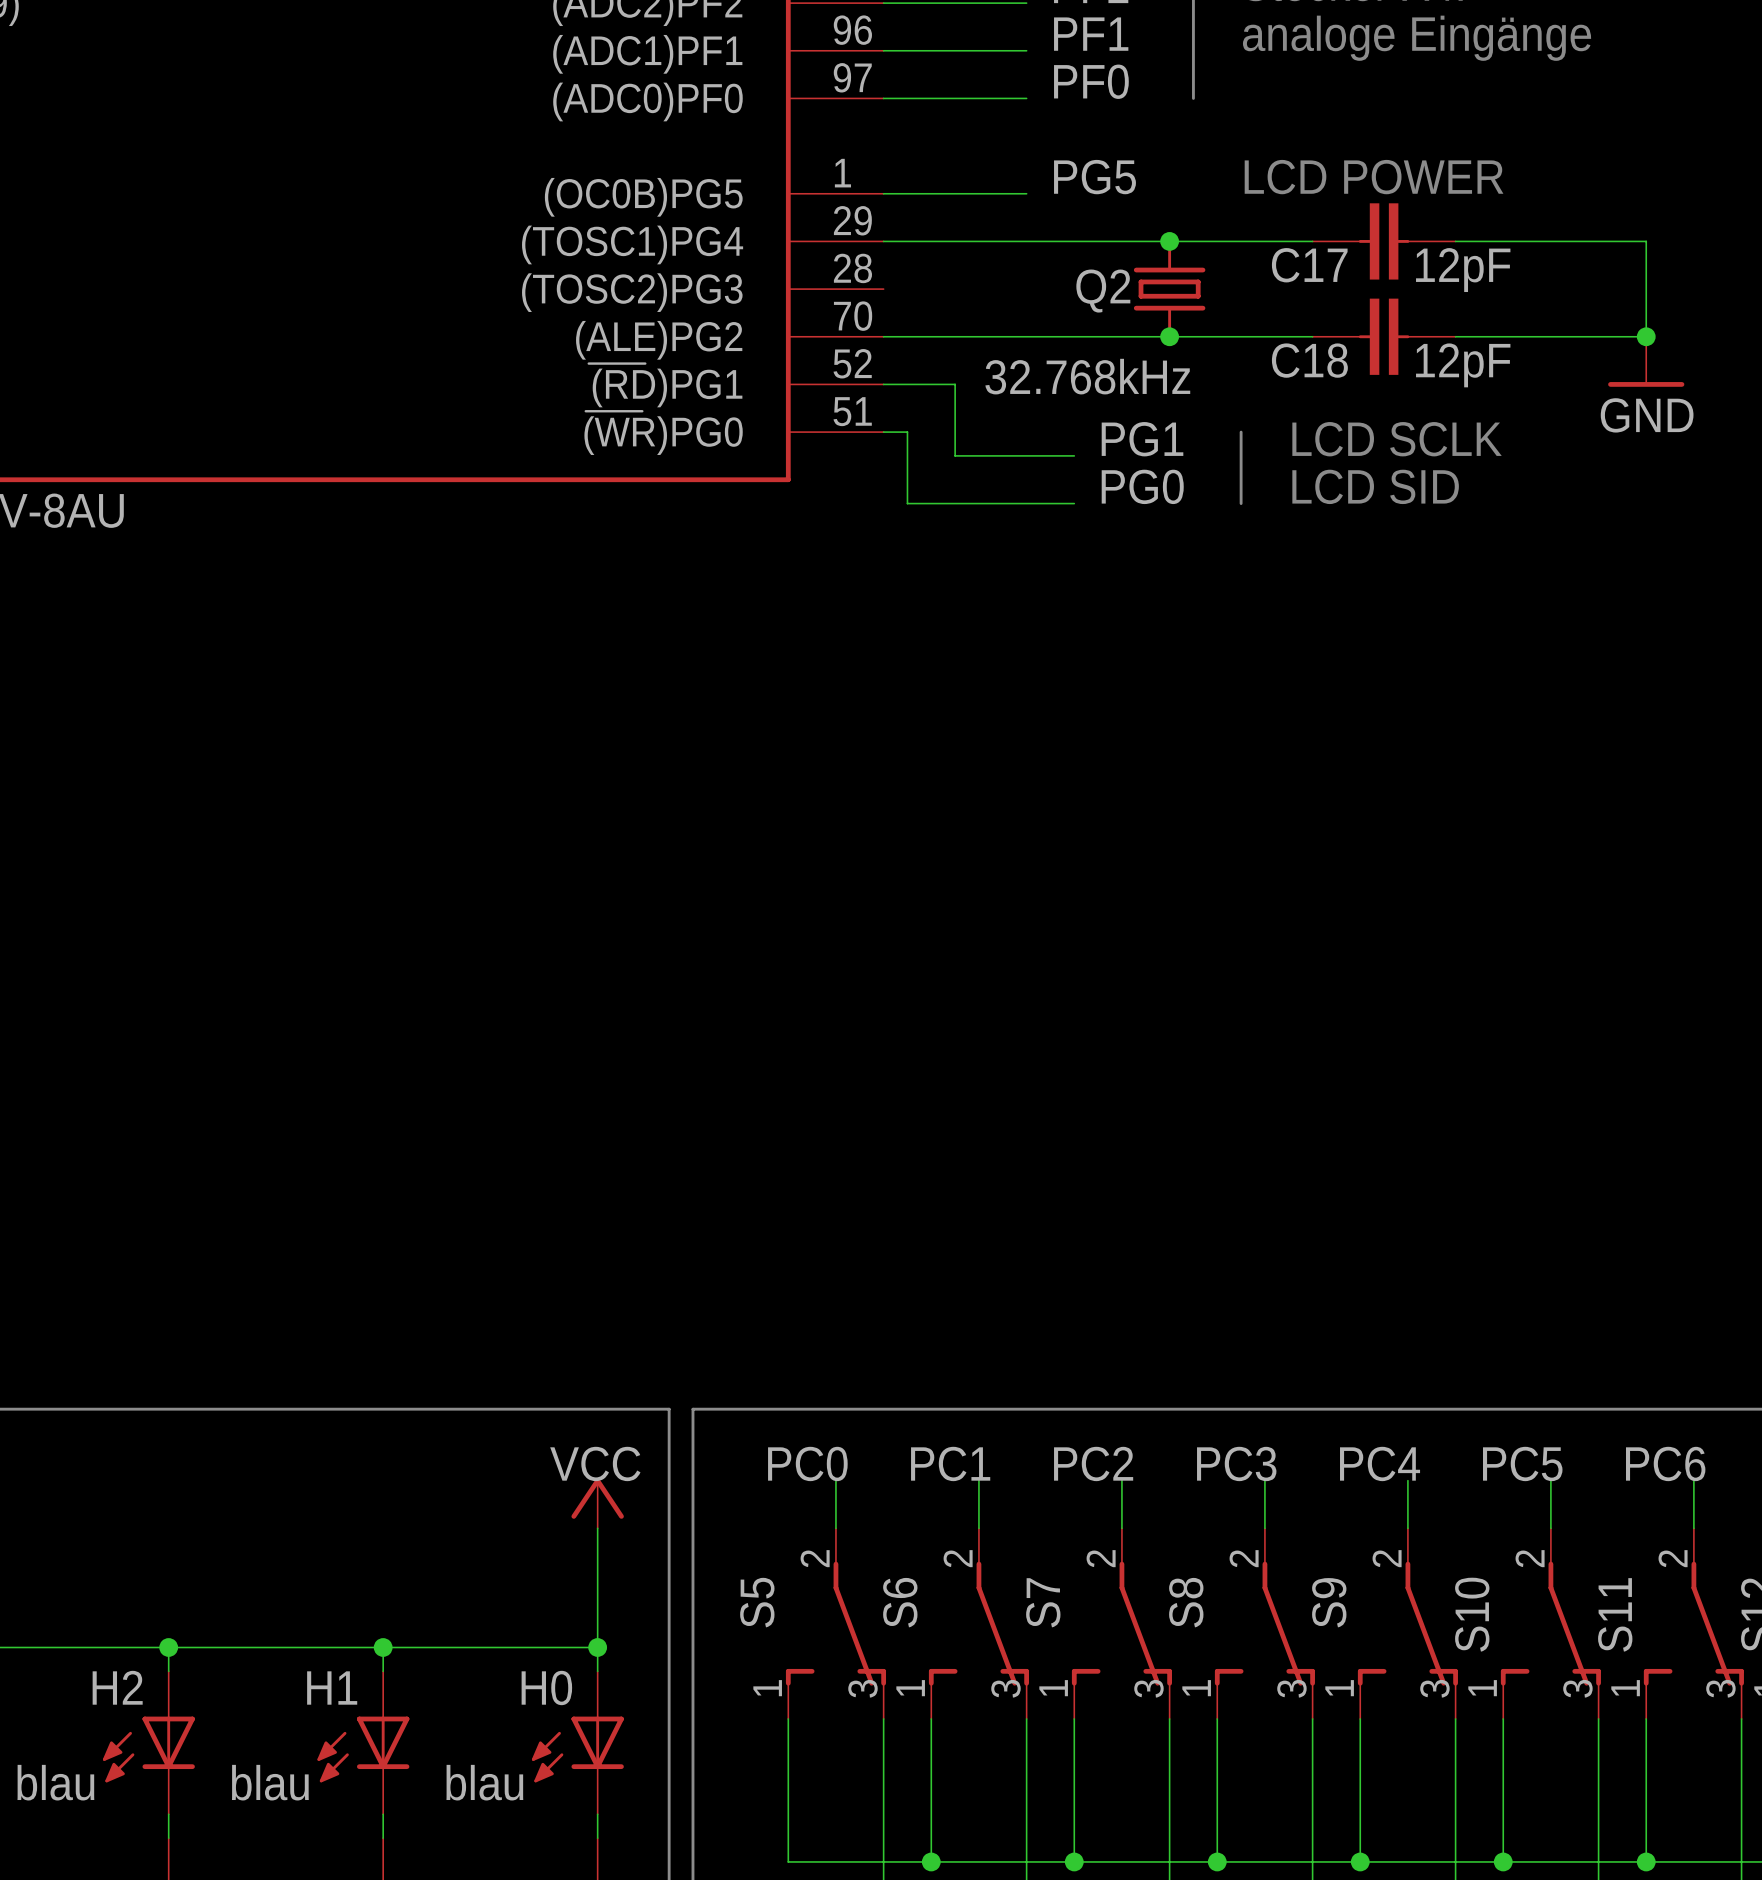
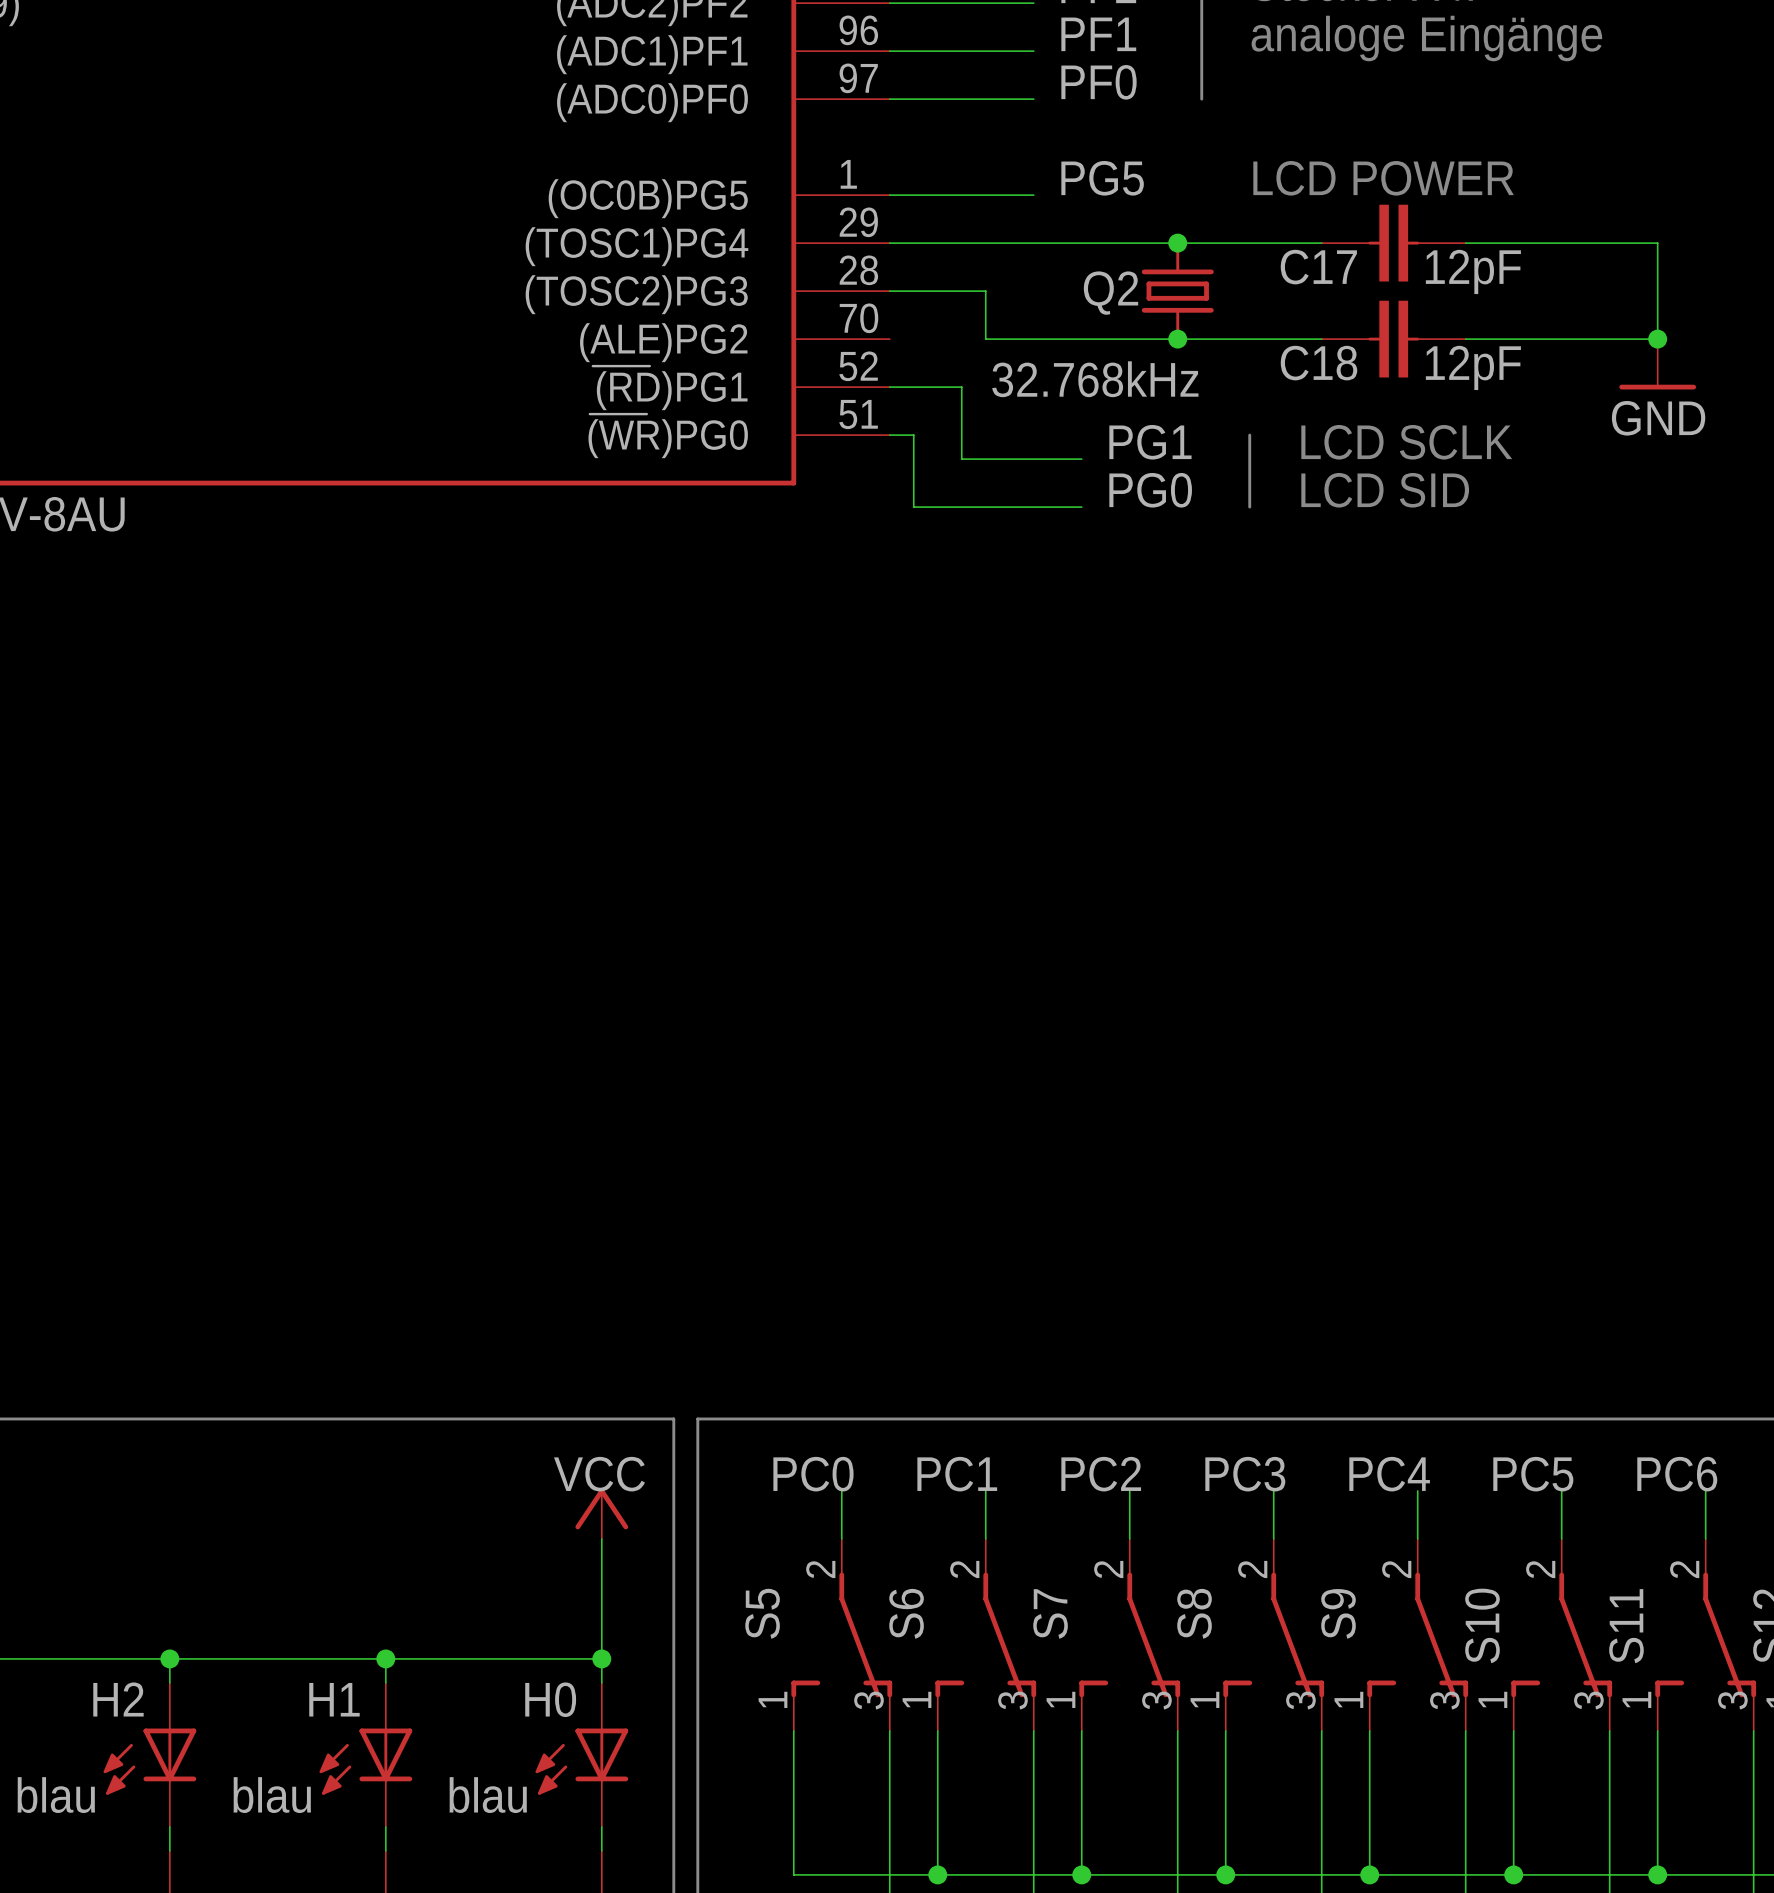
wire: (883, 336) (978, 336) -> (889, 291) (985, 291) (985, 339)

